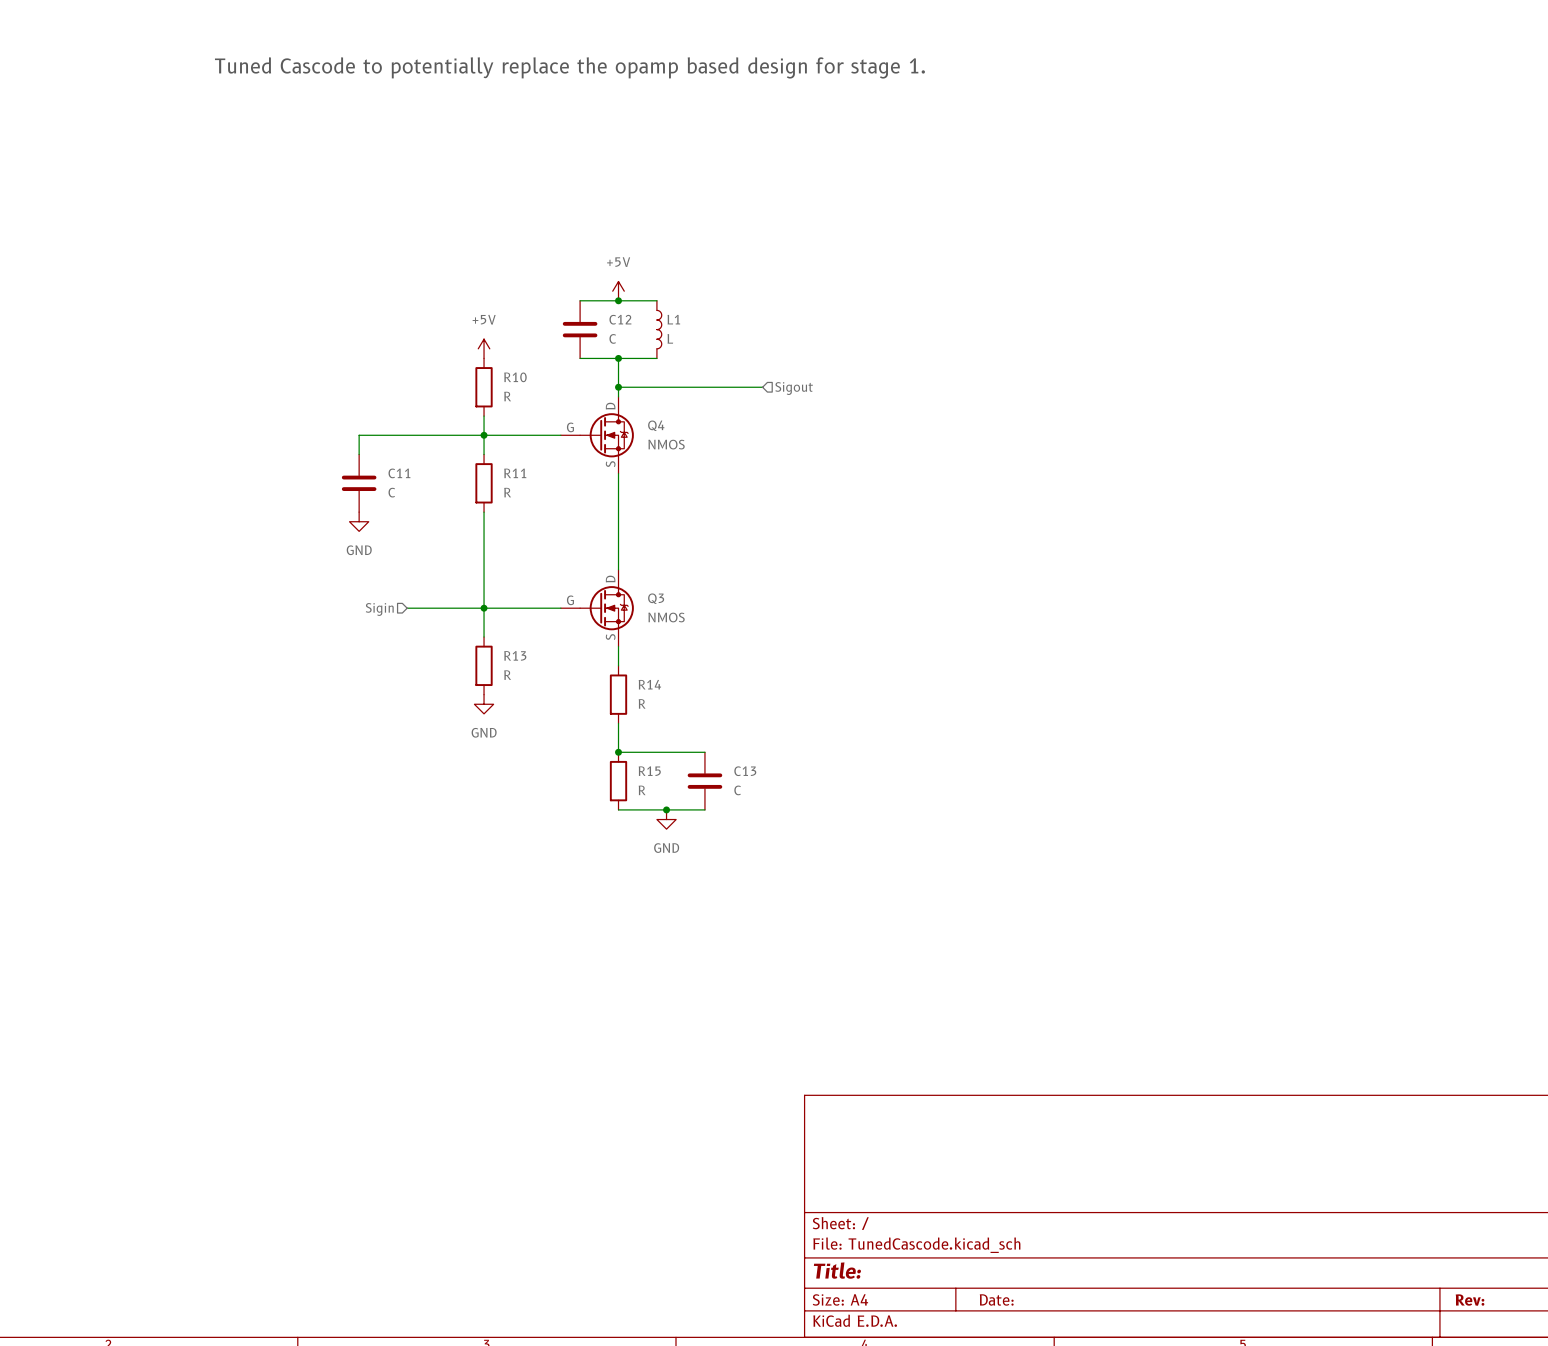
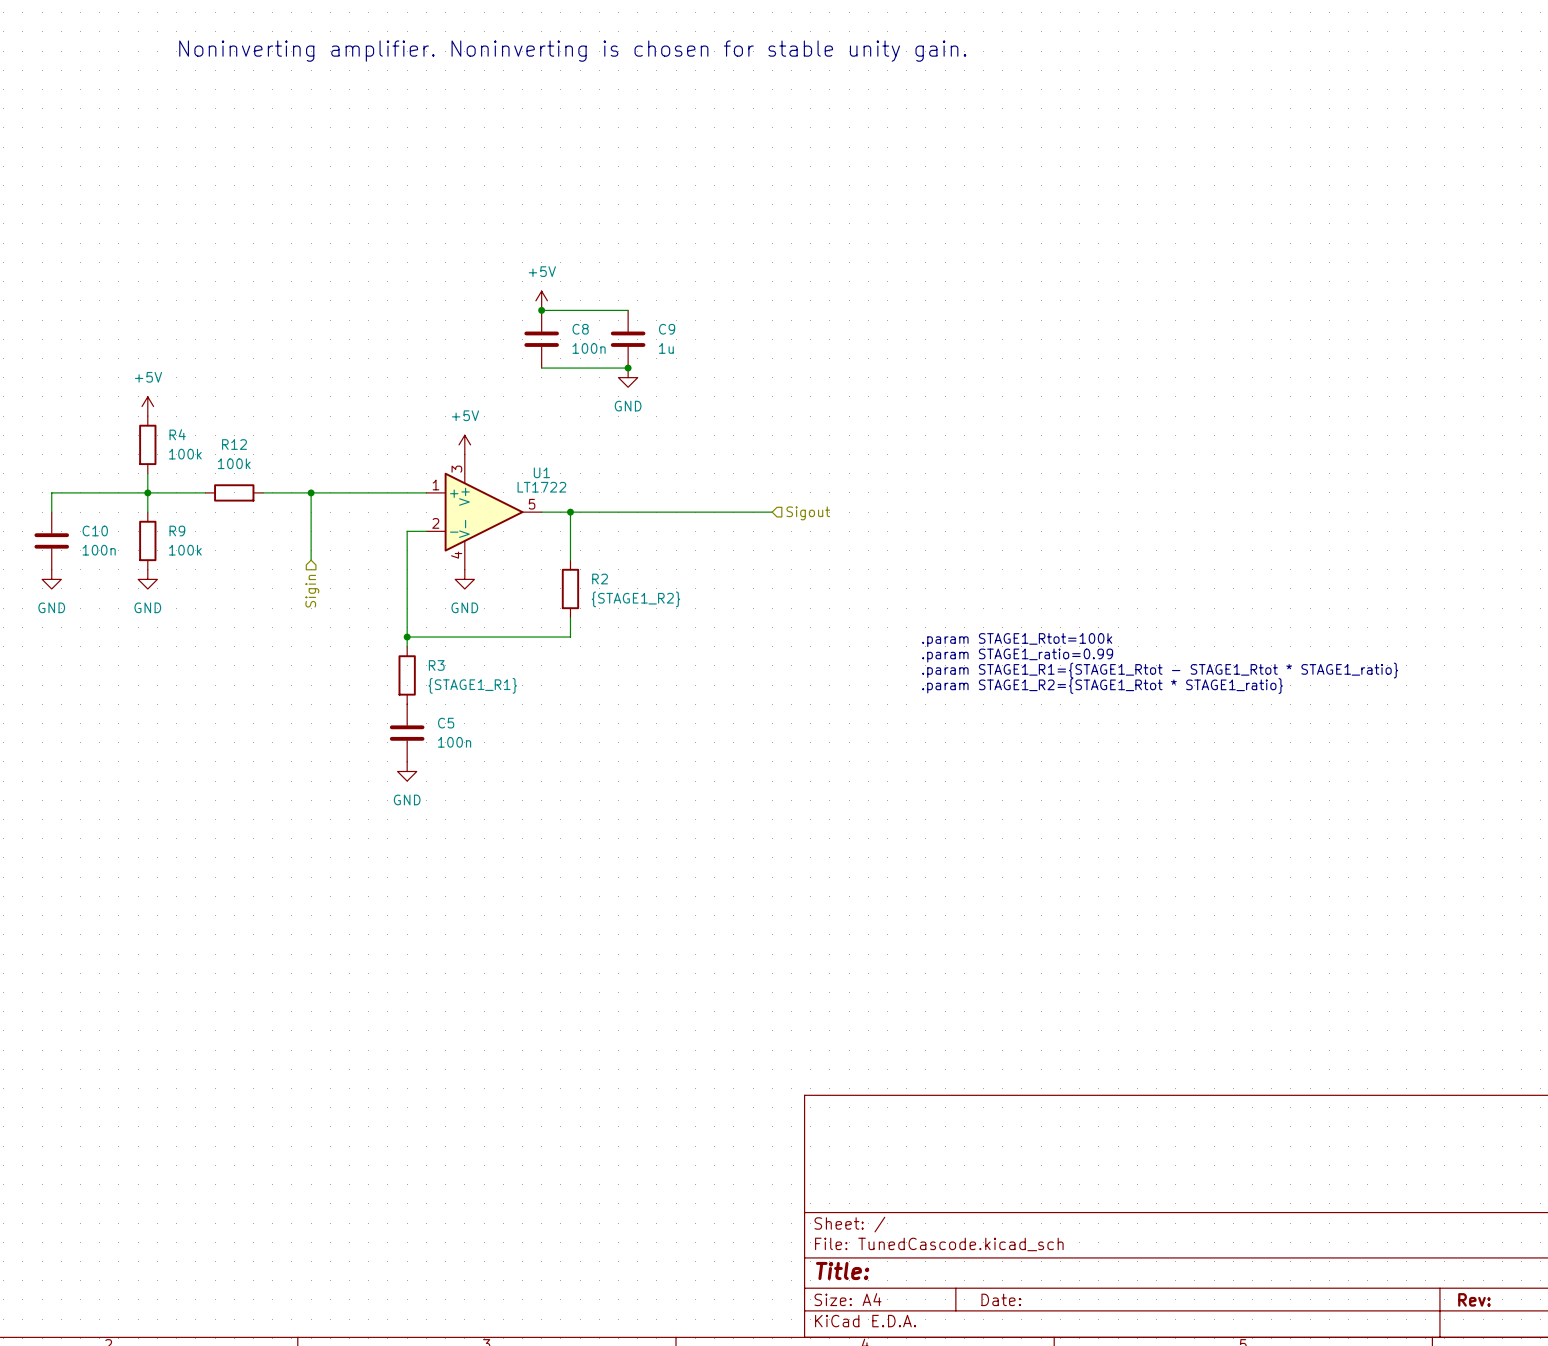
text: none -> Noninverting amplifier. Noninverting is chosen for stable unity gain. (572, 51)
text: Tuned Cascode to potentially replace the opamp based design for stage 1. (569, 67) -> none
power symbol: +5V (618, 291) -> none
power symbol: none -> +5V (541, 300)
wire: (580, 300) (656, 300) -> none
junction: (618, 300) -> none
wire: none -> (541, 310) (628, 310)
junction: none -> (541, 310)
C12: C (580, 329) -> none
L1: L (659, 329) -> none
C8: none -> 100n (541, 339)
C9: none -> 1u (628, 339)
power symbol: +5V (484, 348) -> none
wire: (580, 358) (656, 358) -> none
wire: (618, 358) (618, 396) -> none
junction: (618, 358) -> none
wire: none -> (541, 368) (628, 368)
junction: none -> (628, 368)
power symbol: none -> GND (628, 377)
R10: R (484, 387) -> none
wire: (618, 387) (762, 387) -> none
junction: (618, 387) -> none
hierarchical label position: Sigout (794, 388) -> Sigout (808, 513)
power symbol: none -> +5V (147, 406)
wire: (484, 416) (484, 454) -> none
junction: (484, 435) -> none
wire: (560, 435) (359, 435) (359, 454) -> none
Q4: NMOS (597, 435) -> none
R4: none -> 100k (147, 444)
power symbol: none -> +5V (464, 444)
wire: none -> (147, 473) (147, 512)
wire: (618, 473) (618, 569) -> none
C11: C (359, 483) -> none
R11: R (484, 483) -> none
junction: none -> (147, 492)
wire: none -> (205, 492) (51, 492) (51, 512)
R12: none -> 100k (234, 492)
wire: none -> (263, 492) (426, 492)
wire: none -> (311, 492) (311, 560)
junction: none -> (311, 492)
wire: (484, 512) (484, 637) -> none
U1: none -> LT1722 (484, 512)
wire: none -> (541, 512) (772, 512)
wire: none -> (570, 512) (570, 560)
junction: none -> (570, 512)
power symbol: GND (359, 521) -> none
wire: none -> (426, 531) (407, 531) (407, 646)
C10: none -> 100n (51, 540)
R9: none -> 100k (147, 540)
power symbol: none -> GND (51, 579)
power symbol: none -> GND (147, 579)
power symbol: none -> GND (464, 579)
R2: none -> {STAGE1_R2} (570, 588)
wire: (407, 608) (560, 608) -> none
junction: (484, 608) -> none
Q3: NMOS (597, 608) -> none
hierarchical label rotation: 0° (379, 609) -> 90° counterclockwise (312, 591)
hierarchical label position: Sigin (379, 609) -> Sigin (312, 591)
wire: none -> (570, 617) (570, 637) (407, 637)
junction: none -> (407, 637)
text: none -> .param STAGE1_Rtot=100k (1017, 640)
wire: (618, 646) (618, 665) -> none
text: none -> .param STAGE1_ratio=0.99 (1017, 655)
R13: R (484, 665) -> none
text: none -> .param STAGE1_R1={STAGE1_Rtot - STAGE1_Rtot * STAGE1_ratio} (1160, 670)
R3: none -> {STAGE1_R1} (407, 675)
text: none -> .param STAGE1_R2={STAGE1_Rtot * STAGE1_ratio} (1102, 686)
R14: R (618, 694) -> none
power symbol: GND (484, 704) -> none
wire: (618, 723) (618, 752) (704, 752) -> none
C5: none -> 100n (407, 733)
junction: (618, 752) -> none
power symbol: none -> GND (407, 771)
R15: R (618, 781) -> none
C13: C (704, 781) -> none
wire: (618, 809) (704, 809) -> none
junction: (666, 809) -> none
power symbol: GND (666, 819) -> none

